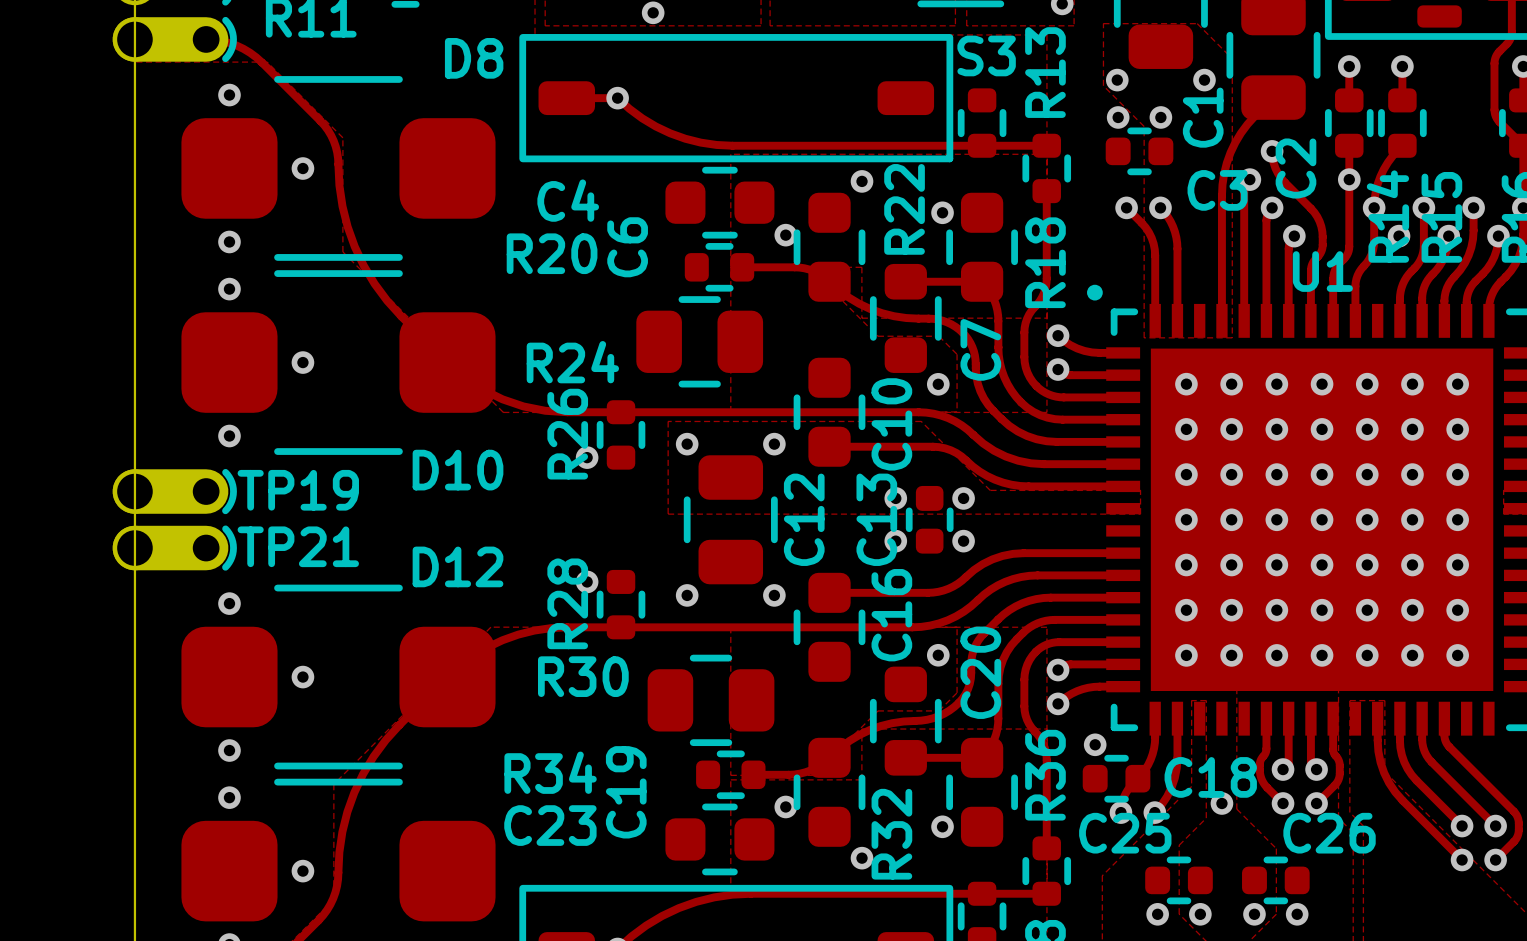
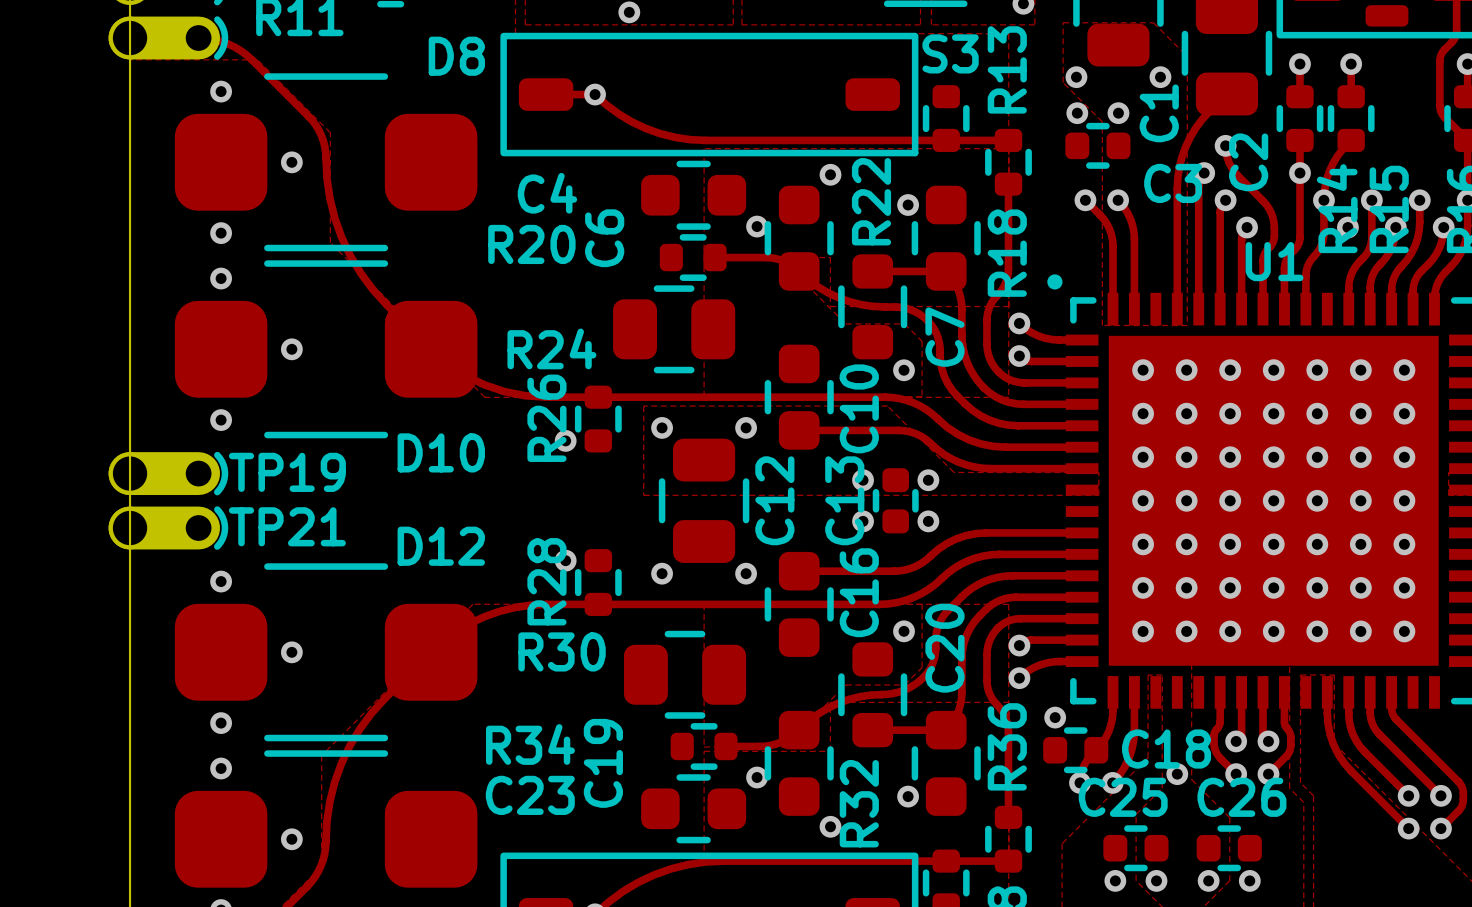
C25 name position: C25 (1125, 833) -> C25 (1123, 797)
C26 name position: C26 (1329, 833) -> C26 (1241, 797)

